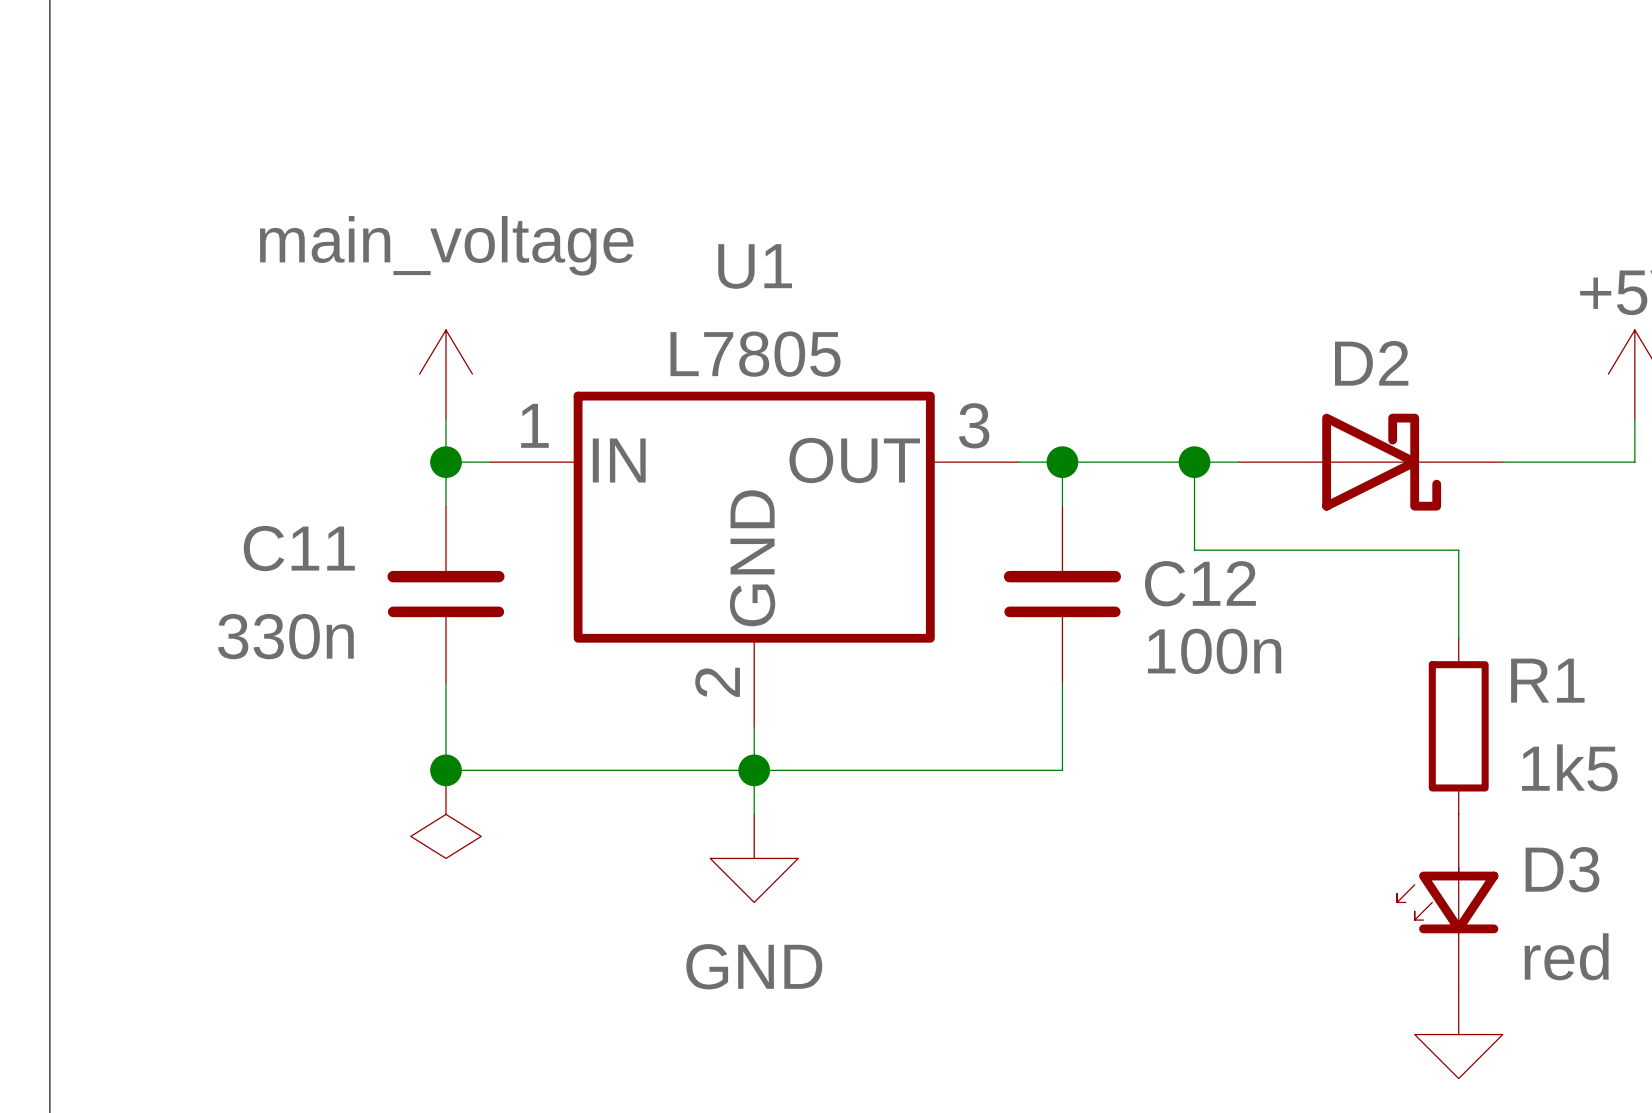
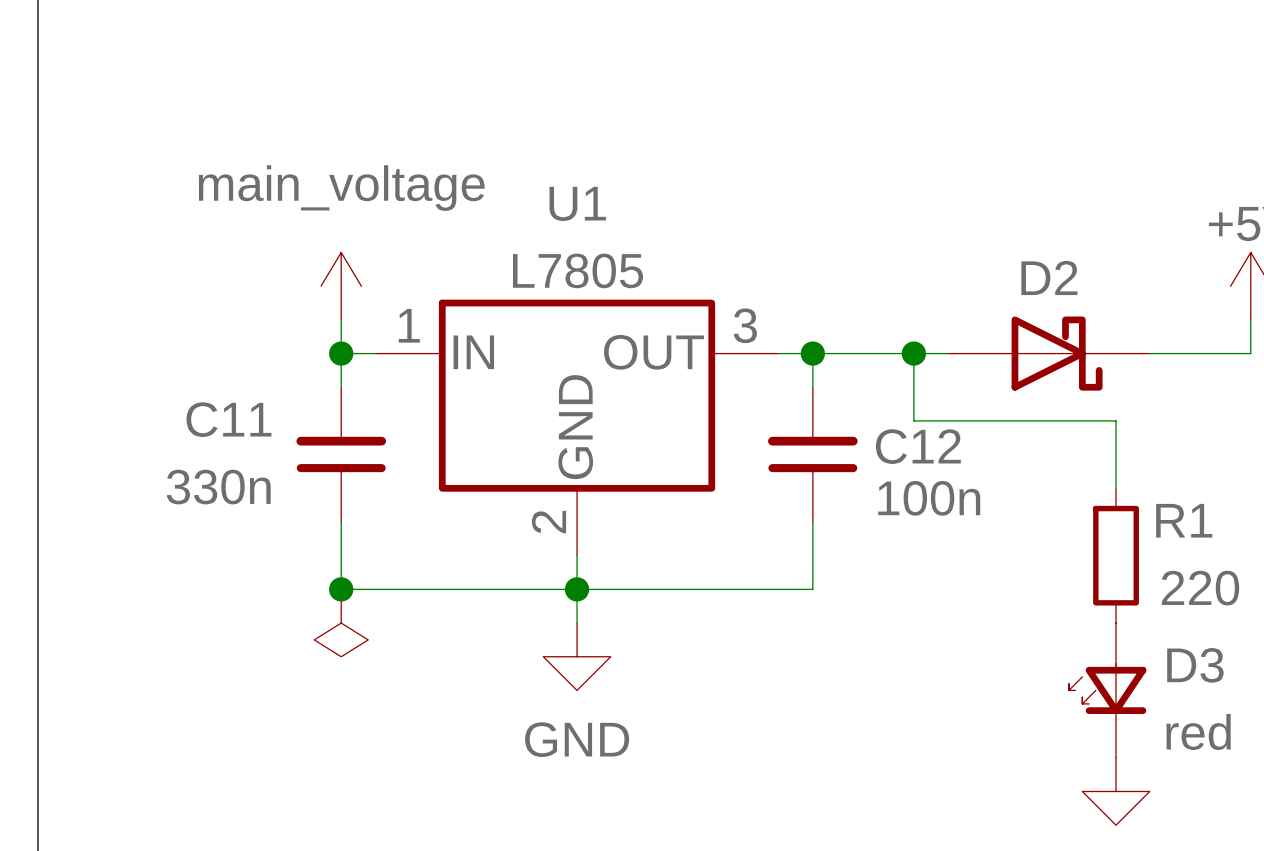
R1 value: 1k5 (1569, 767) -> 220 (1200, 588)

